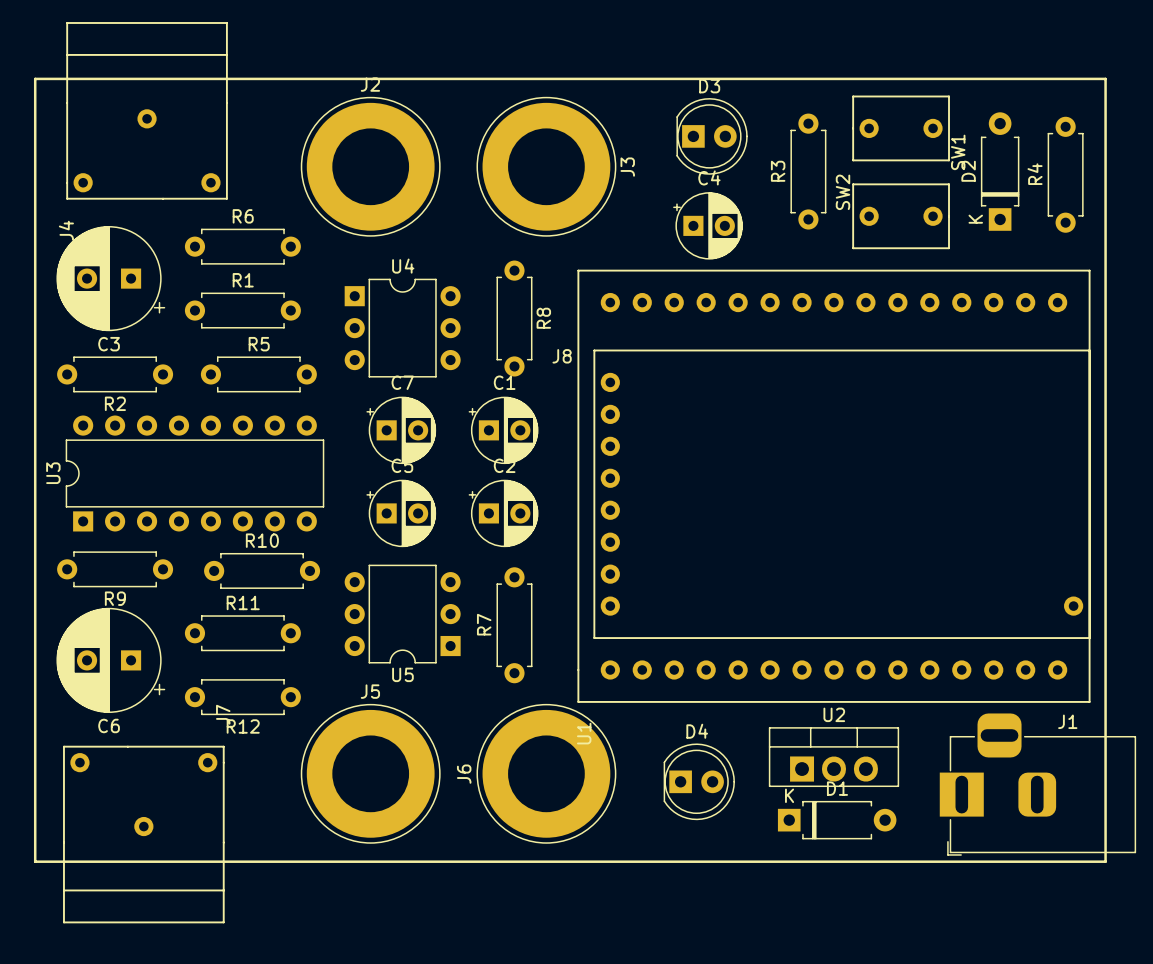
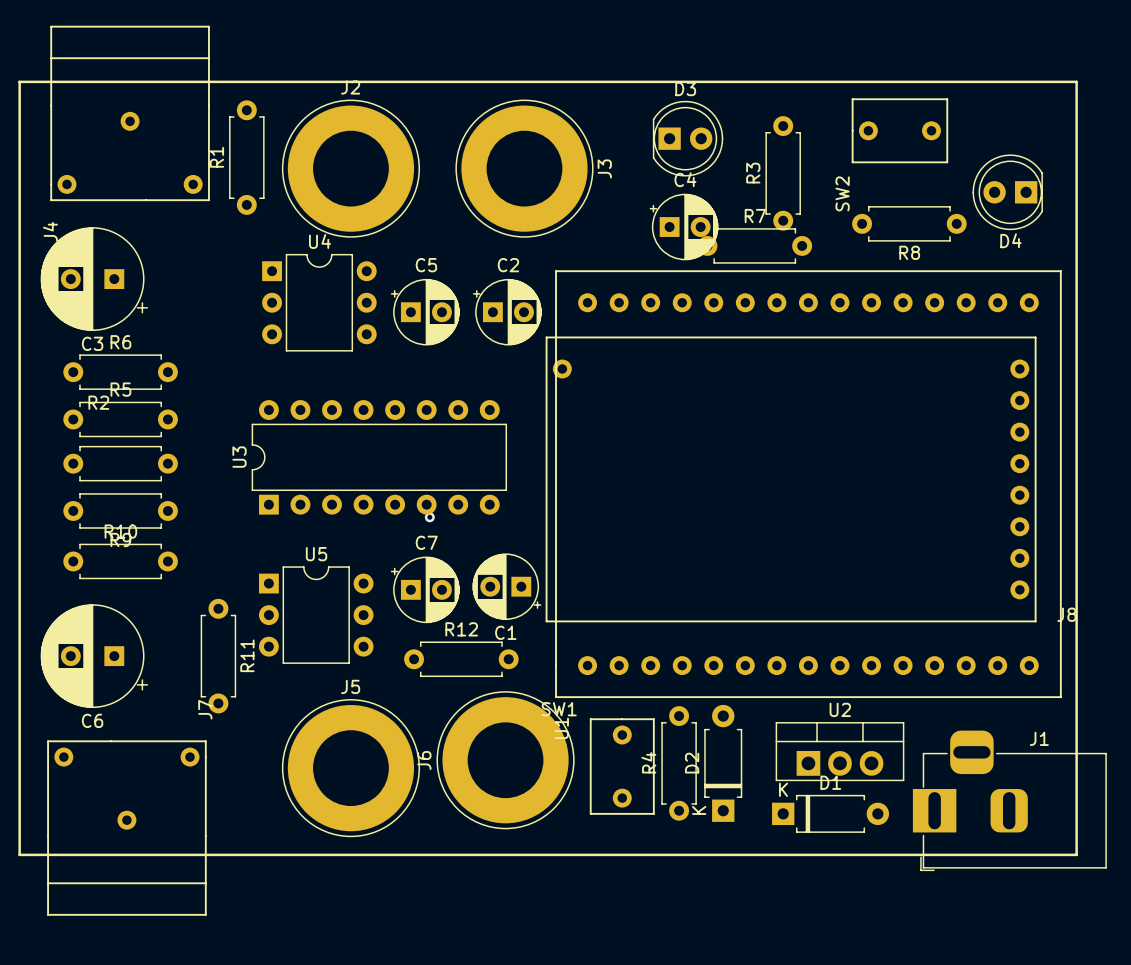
SW2 position: (901, 128) -> (899, 130)
D2 position: (1000, 171) -> (723, 763)
R4 position: (1065, 174) -> (679, 763)
SW1 rotation: 0° (901, 216) -> 90° counterclockwise (622, 766)
SW1 position: (901, 216) -> (622, 766)
R6 position: (242, 246) -> (120, 372)
R1 name position: R1 (243, 280) -> R1 (216, 157)
R1 rotation: 0° (242, 310) -> 90° clockwise (246, 157)
R1 position: (242, 310) -> (246, 157)
R8 rotation: 0° (514, 318) -> 90° clockwise (909, 223)
R8 position: (514, 318) -> (909, 223)
U4 position: (402, 328) -> (319, 302)
R2 position: (115, 374) -> (120, 463)
R5 position: (258, 374) -> (120, 419)
C7 position: (401, 430) -> (425, 589)
C1 rotation: 0° (503, 430) -> 180° (506, 586)
C1 position: (503, 430) -> (506, 586)
U3 position: (194, 473) -> (379, 457)
J8 rotation: 0° (841, 494) -> 180° (791, 479)
C5 position: (401, 513) -> (425, 312)
C2 position: (503, 513) -> (507, 312)
via: none -> (429, 517)
R9 position: (115, 569) -> (120, 510)
R10 position: (262, 570) -> (120, 561)
U5 rotation: 0° (402, 614) -> 180° (316, 615)
R7 rotation: 0° (514, 625) -> 90° clockwise (754, 245)
R7 position: (514, 625) -> (754, 245)
R11 rotation: 0° (242, 633) -> 90° clockwise (218, 656)
R12 position: (242, 697) -> (461, 659)
R12 name position: R12 (243, 726) -> R12 (461, 629)
U2 position: (833, 757) -> (839, 751)
J6 position: (546, 773) -> (505, 760)
D4 rotation: 0° (699, 781) -> 180° (1007, 192)
D4 position: (699, 781) -> (1007, 192)
J1 position: (1037, 784) -> (1009, 800)
D1 position: (837, 820) -> (830, 813)

